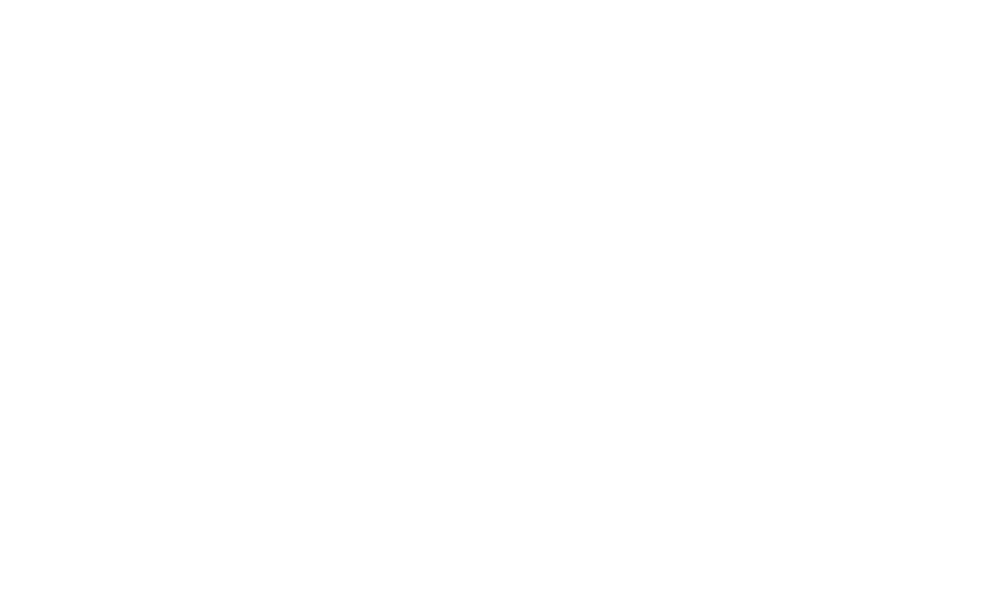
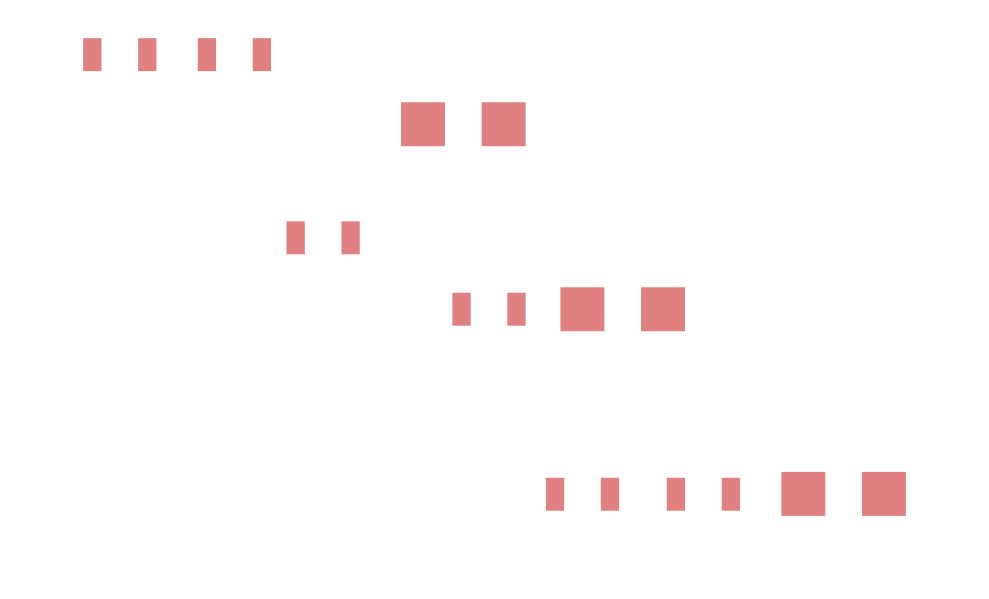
part: none -> (119, 54)
part: none -> (234, 54)
part: none -> (463, 124)
part: none -> (323, 237)
part: none -> (488, 309)
part: none -> (622, 309)
part: none -> (843, 493)
part: none -> (582, 494)
part: none -> (703, 494)

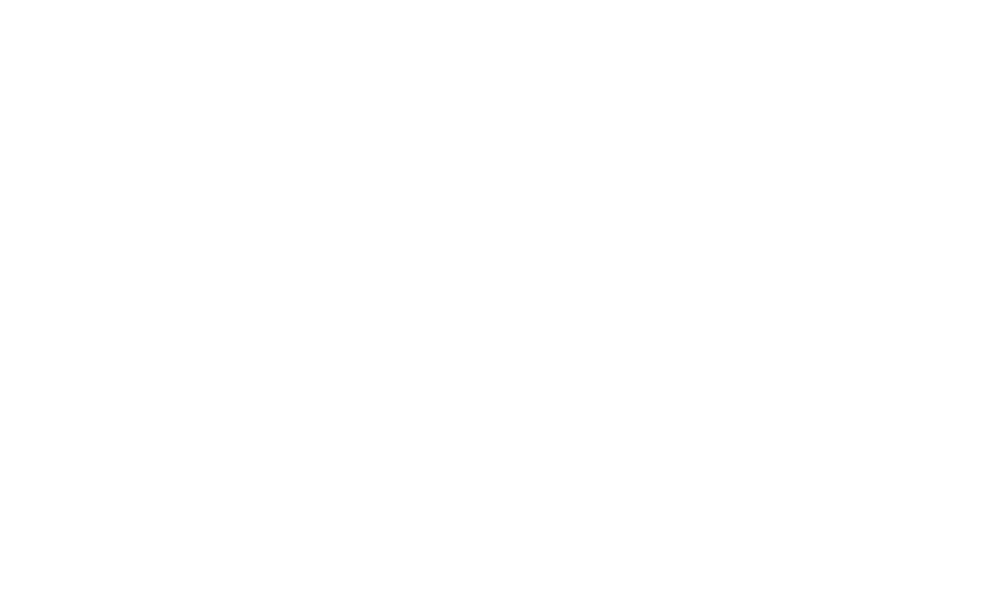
part: (119, 54) -> none
part: (234, 54) -> none
part: (463, 124) -> none
part: (323, 237) -> none
part: (488, 309) -> none
part: (622, 309) -> none
part: (843, 493) -> none
part: (582, 494) -> none
part: (703, 494) -> none

